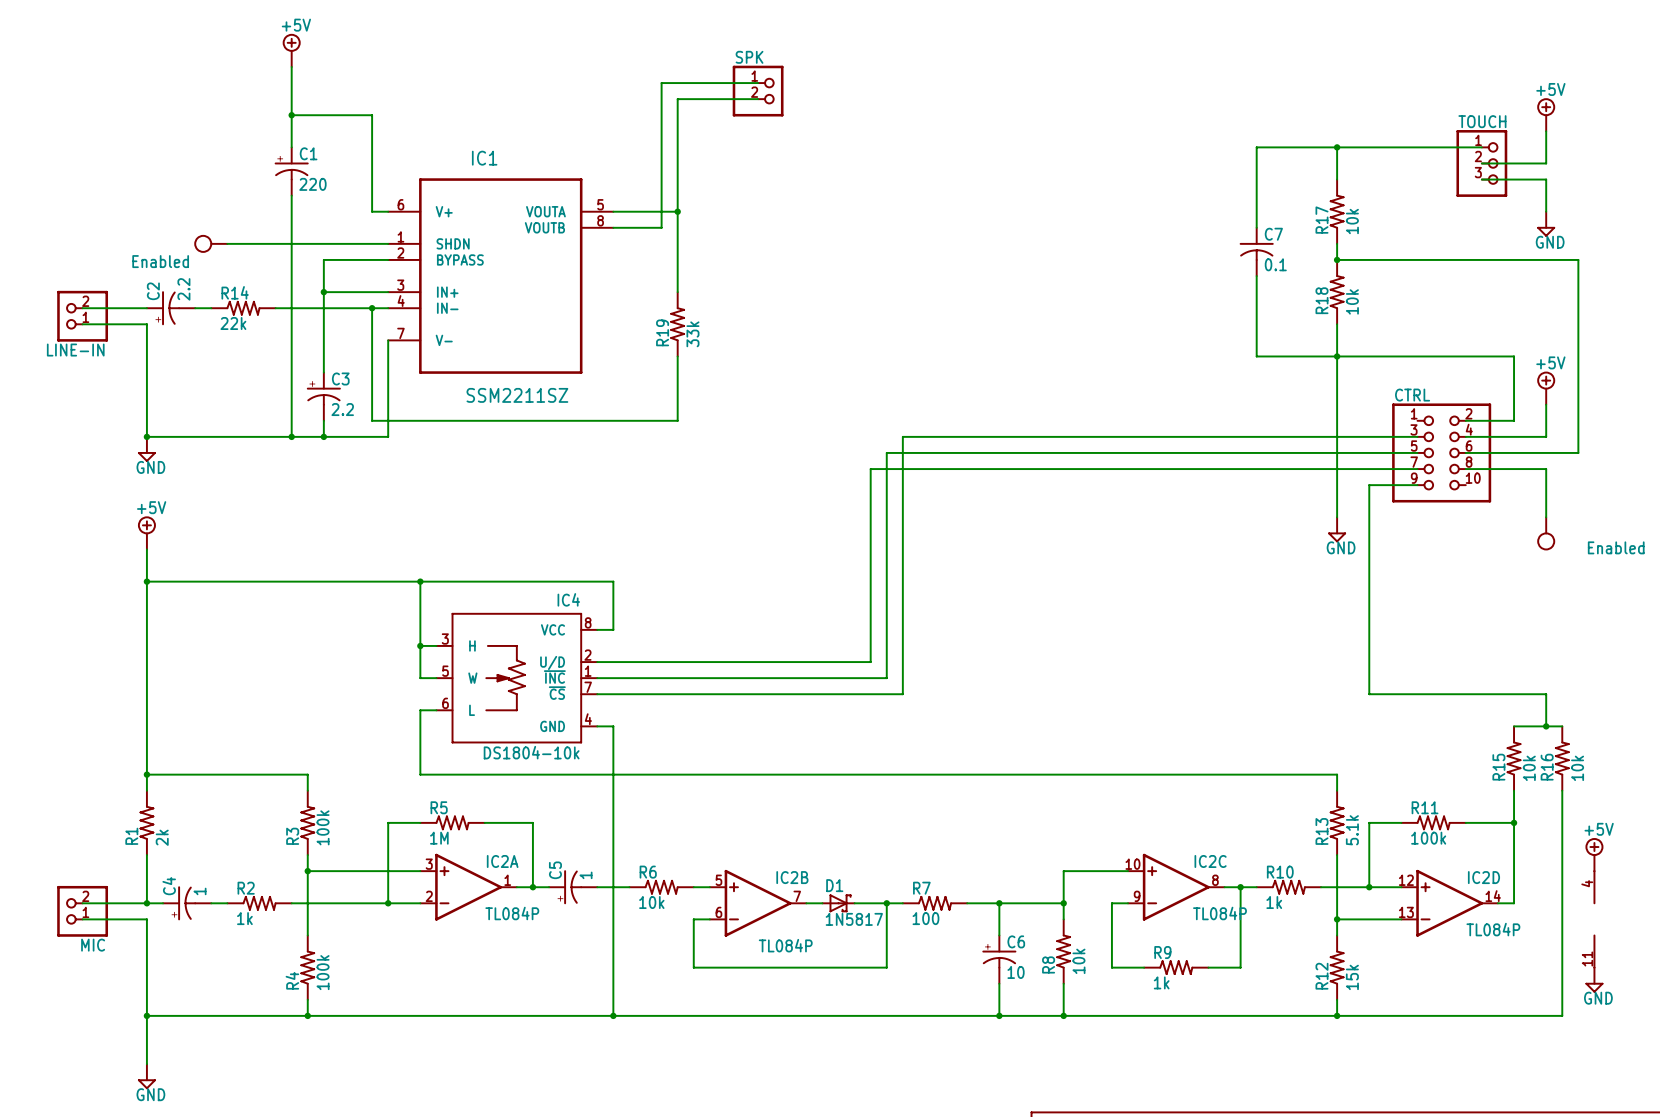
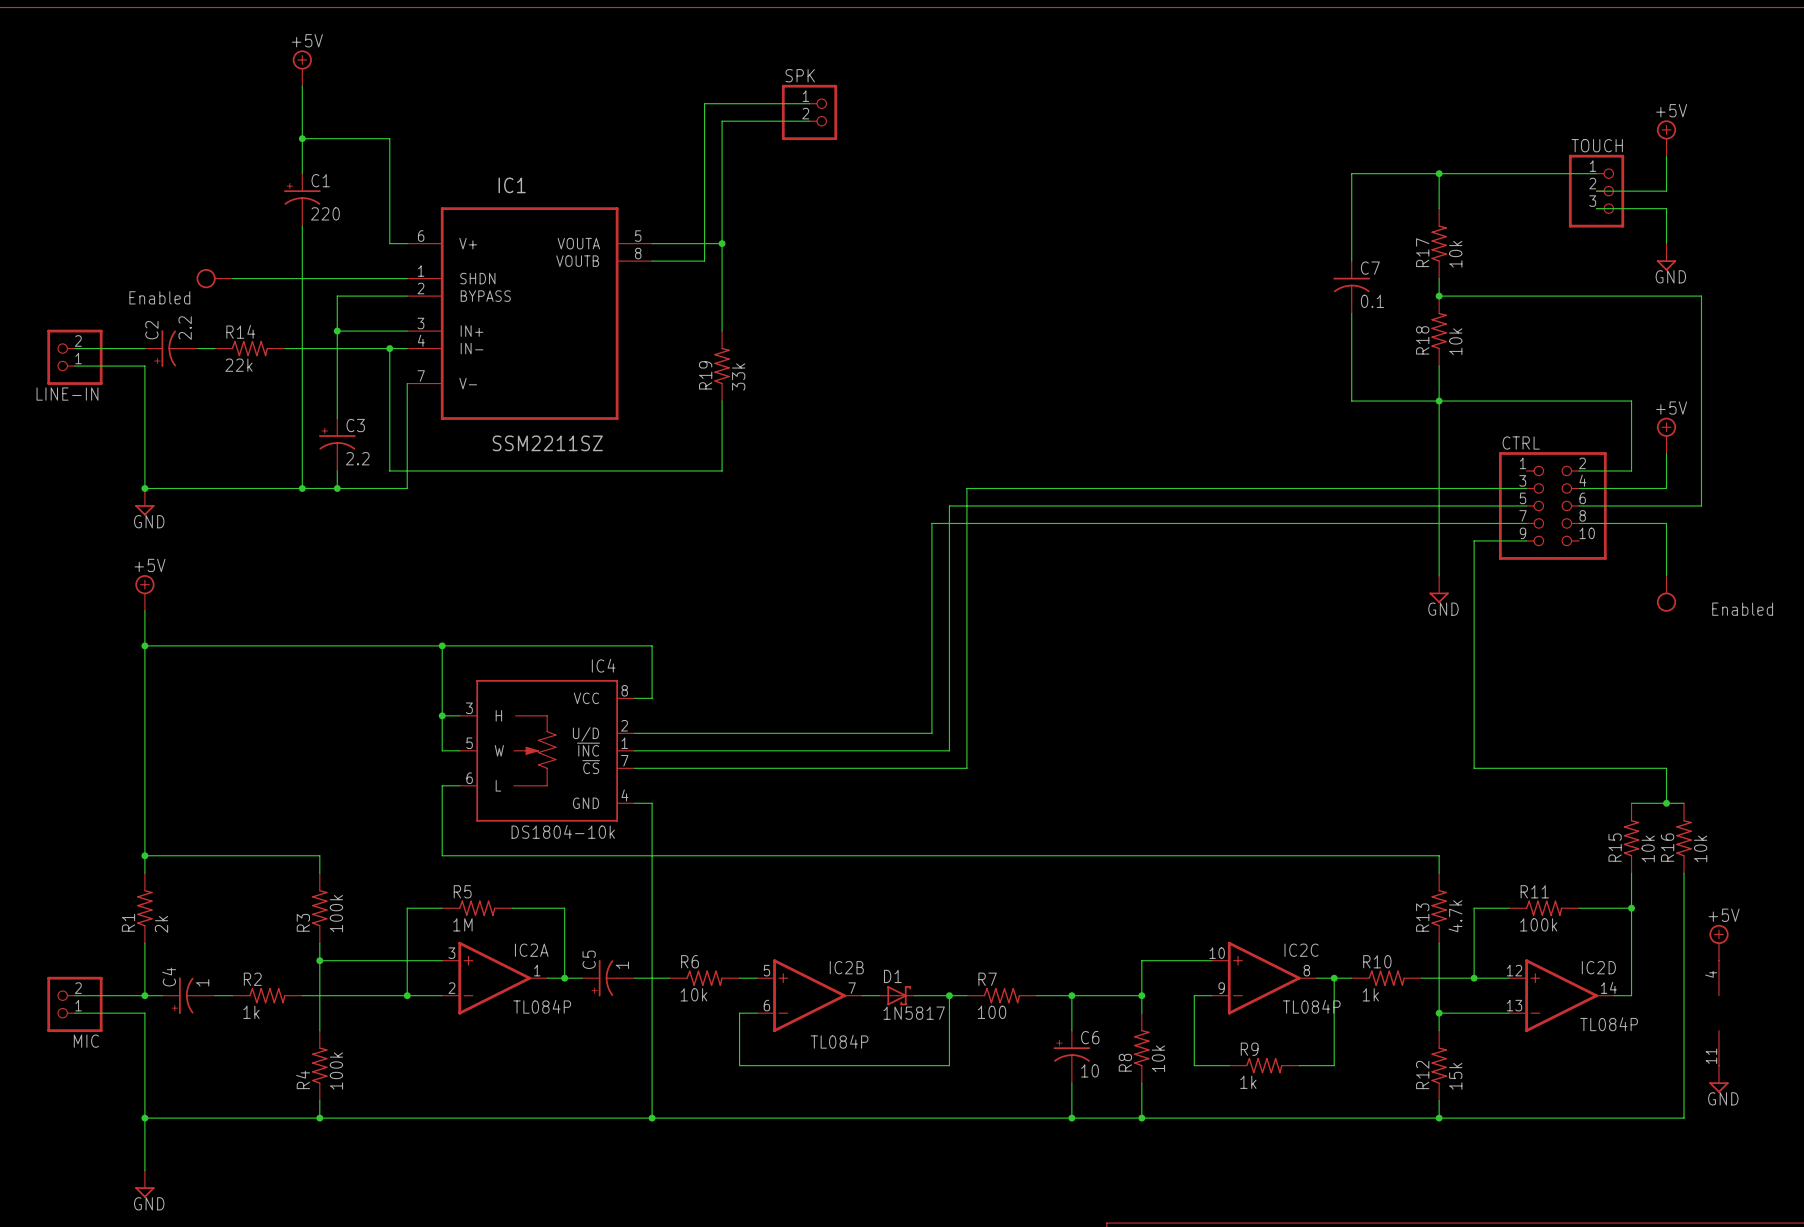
R13 value: 5.1k (1352, 830) -> 4.7k (1455, 916)

